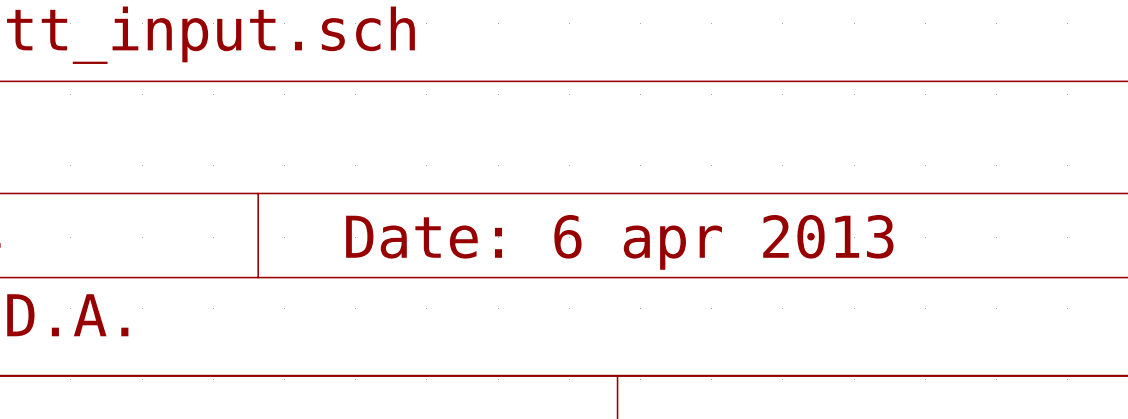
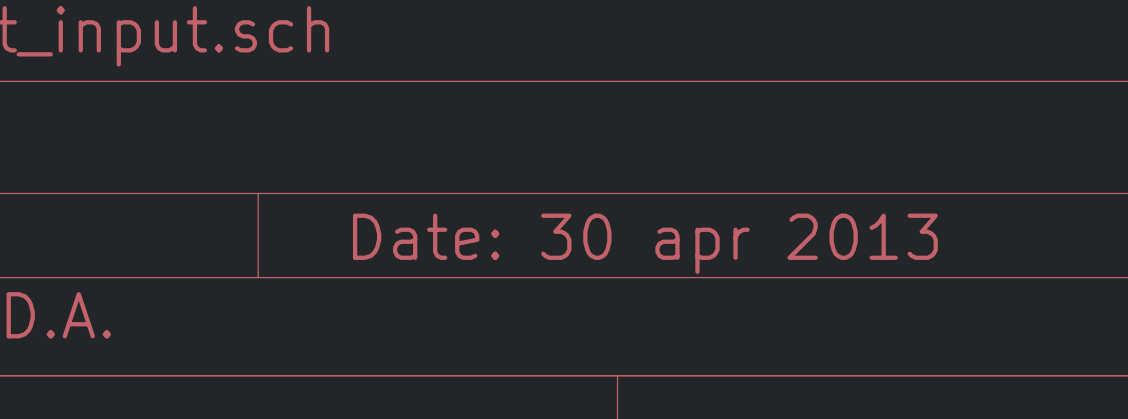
title block: Date: 6 apr 2013 (619, 242) -> Date: 30 apr 2013 (645, 243)

